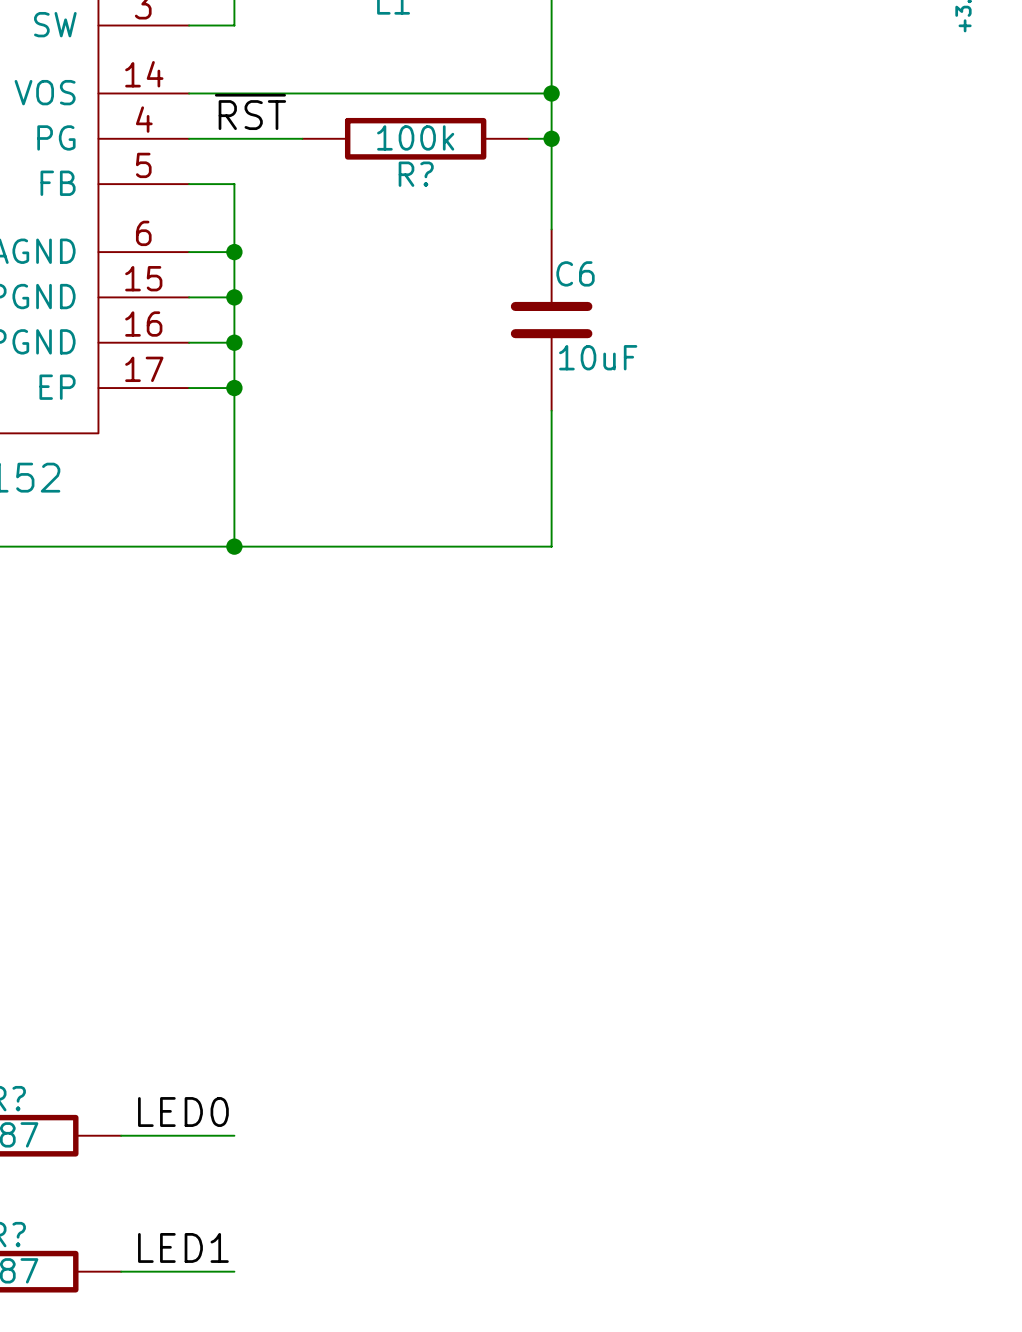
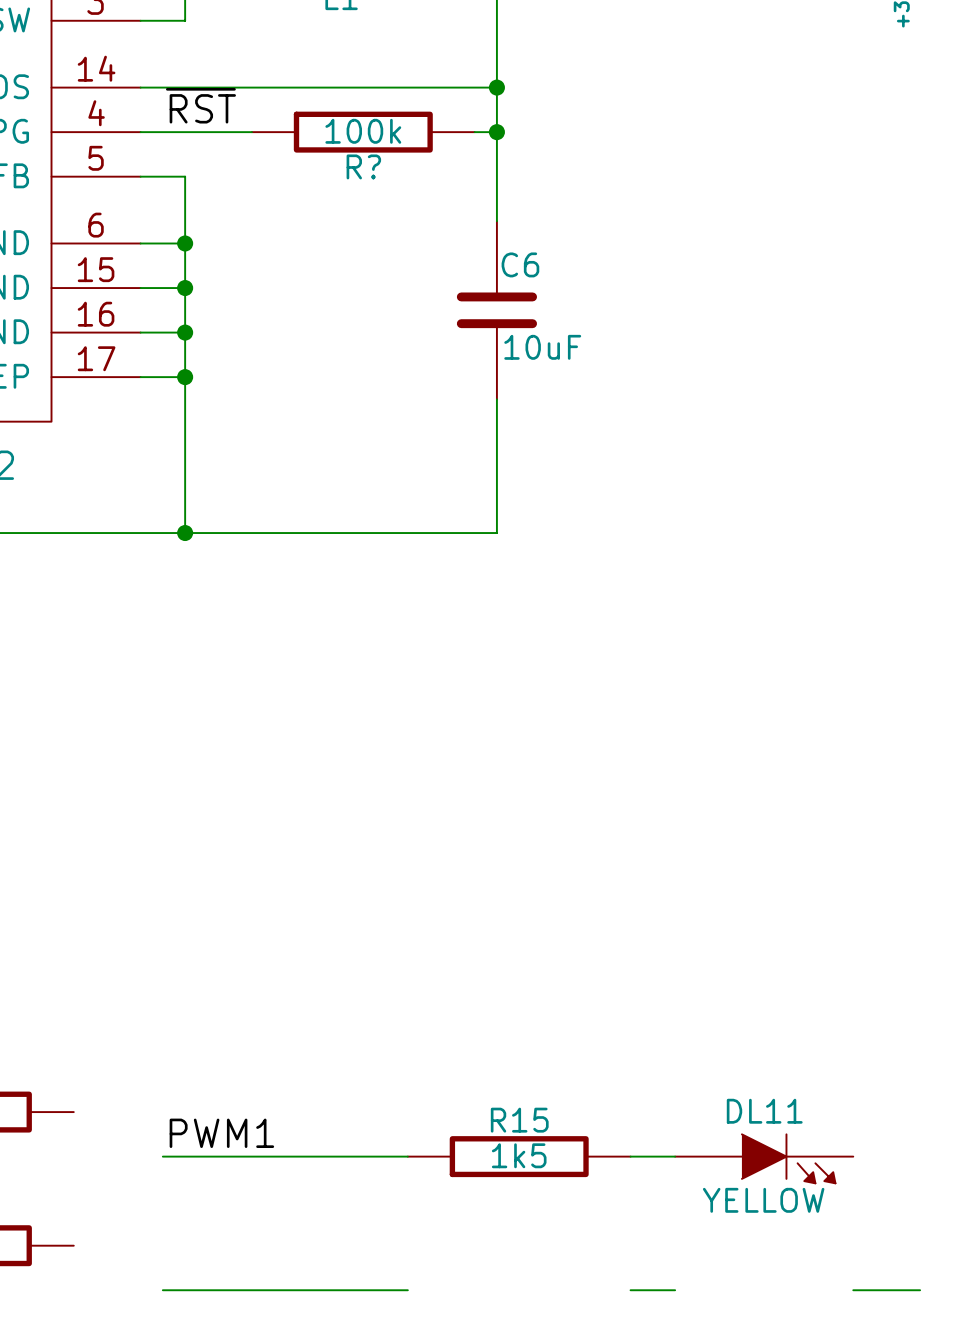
label: LED0 (183, 1112) -> none
wire: (121, 1135) (234, 1135) -> none
label: none -> PWM1 (221, 1133)
wire: none -> (162, 1156) (407, 1156)
R15: none -> 1k5 (519, 1156)
wire: none -> (630, 1156) (675, 1156)
DL11: none -> YELLOW (764, 1158)
label: LED1 (183, 1247) -> none
wire: (121, 1271) (234, 1271) -> none
wire: none -> (162, 1290) (407, 1290)
wire: none -> (630, 1290) (675, 1290)
wire: none -> (853, 1290) (920, 1290)

